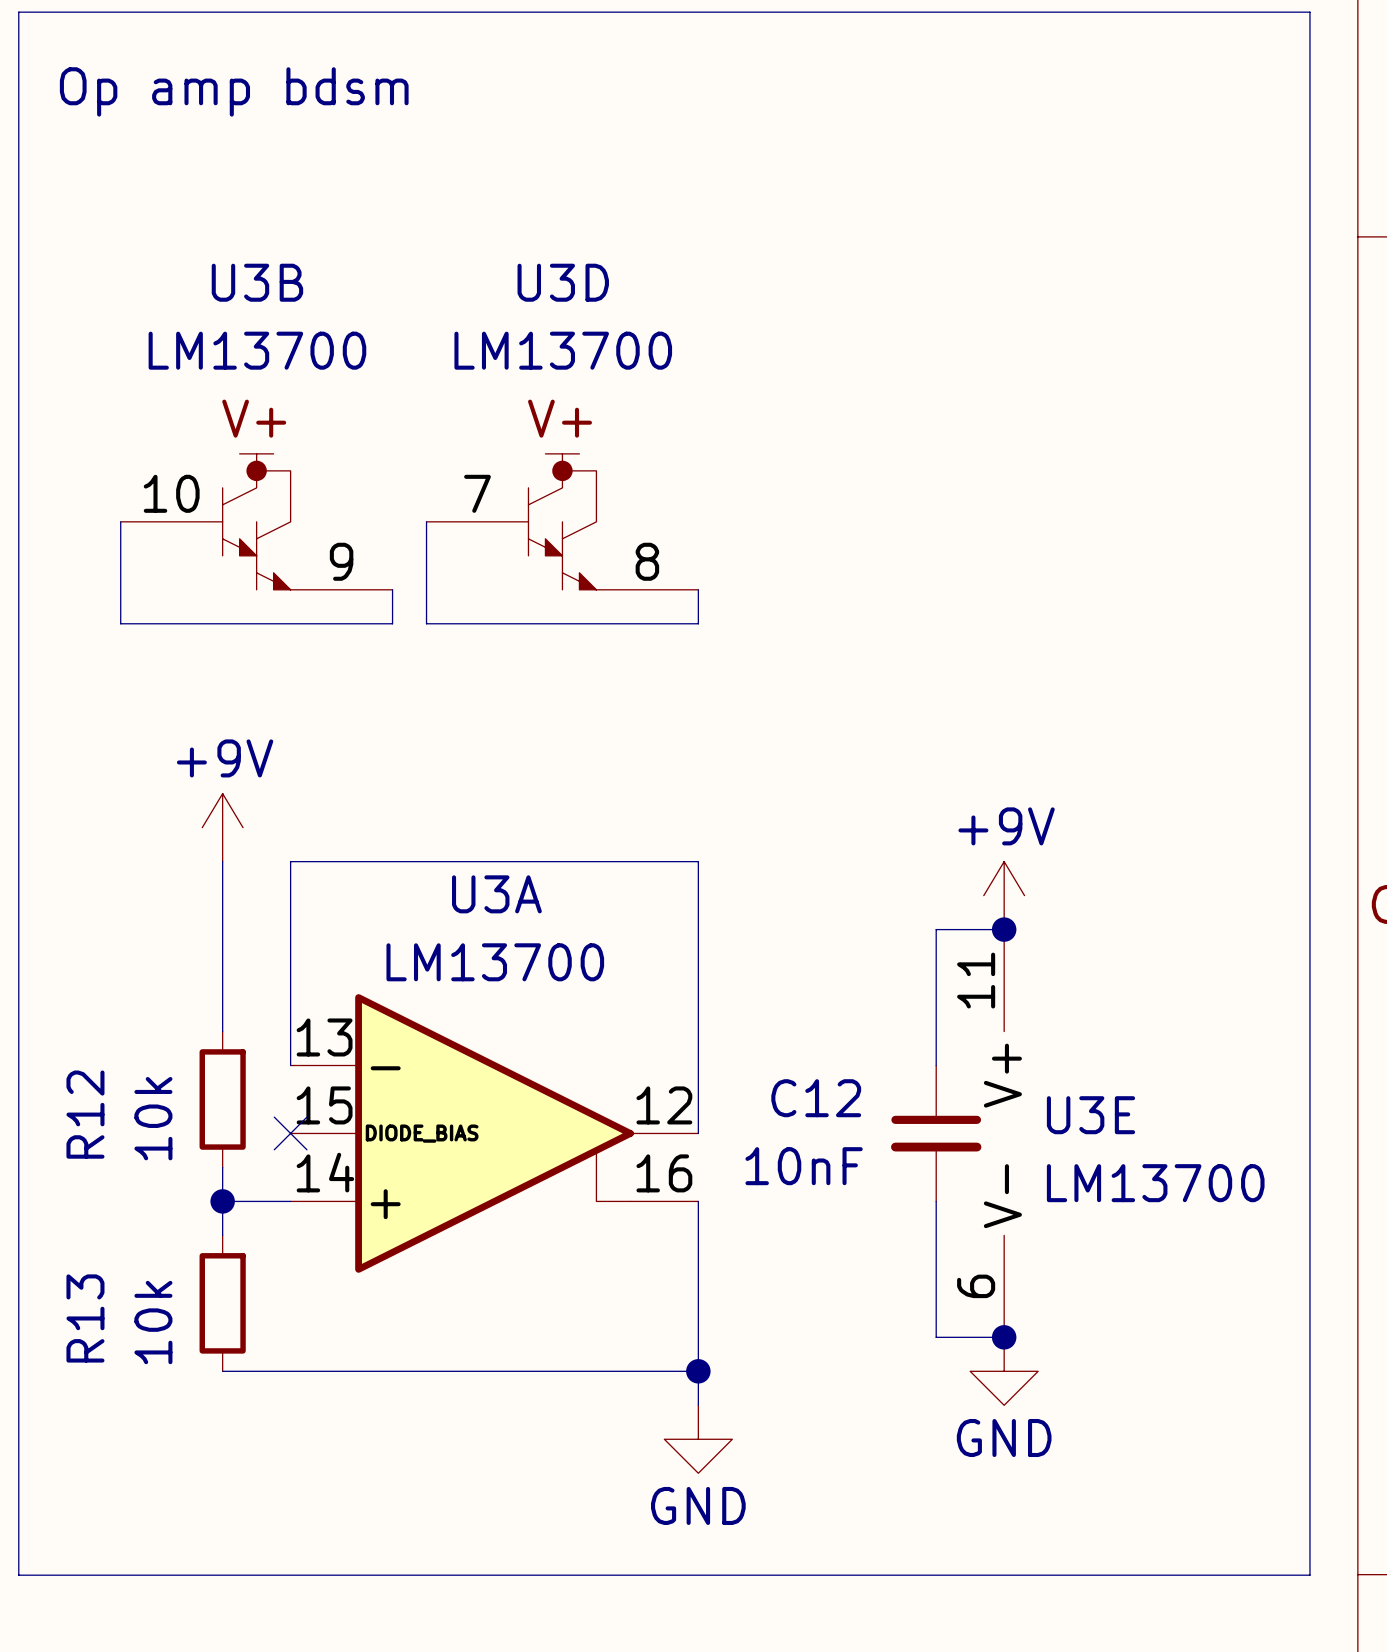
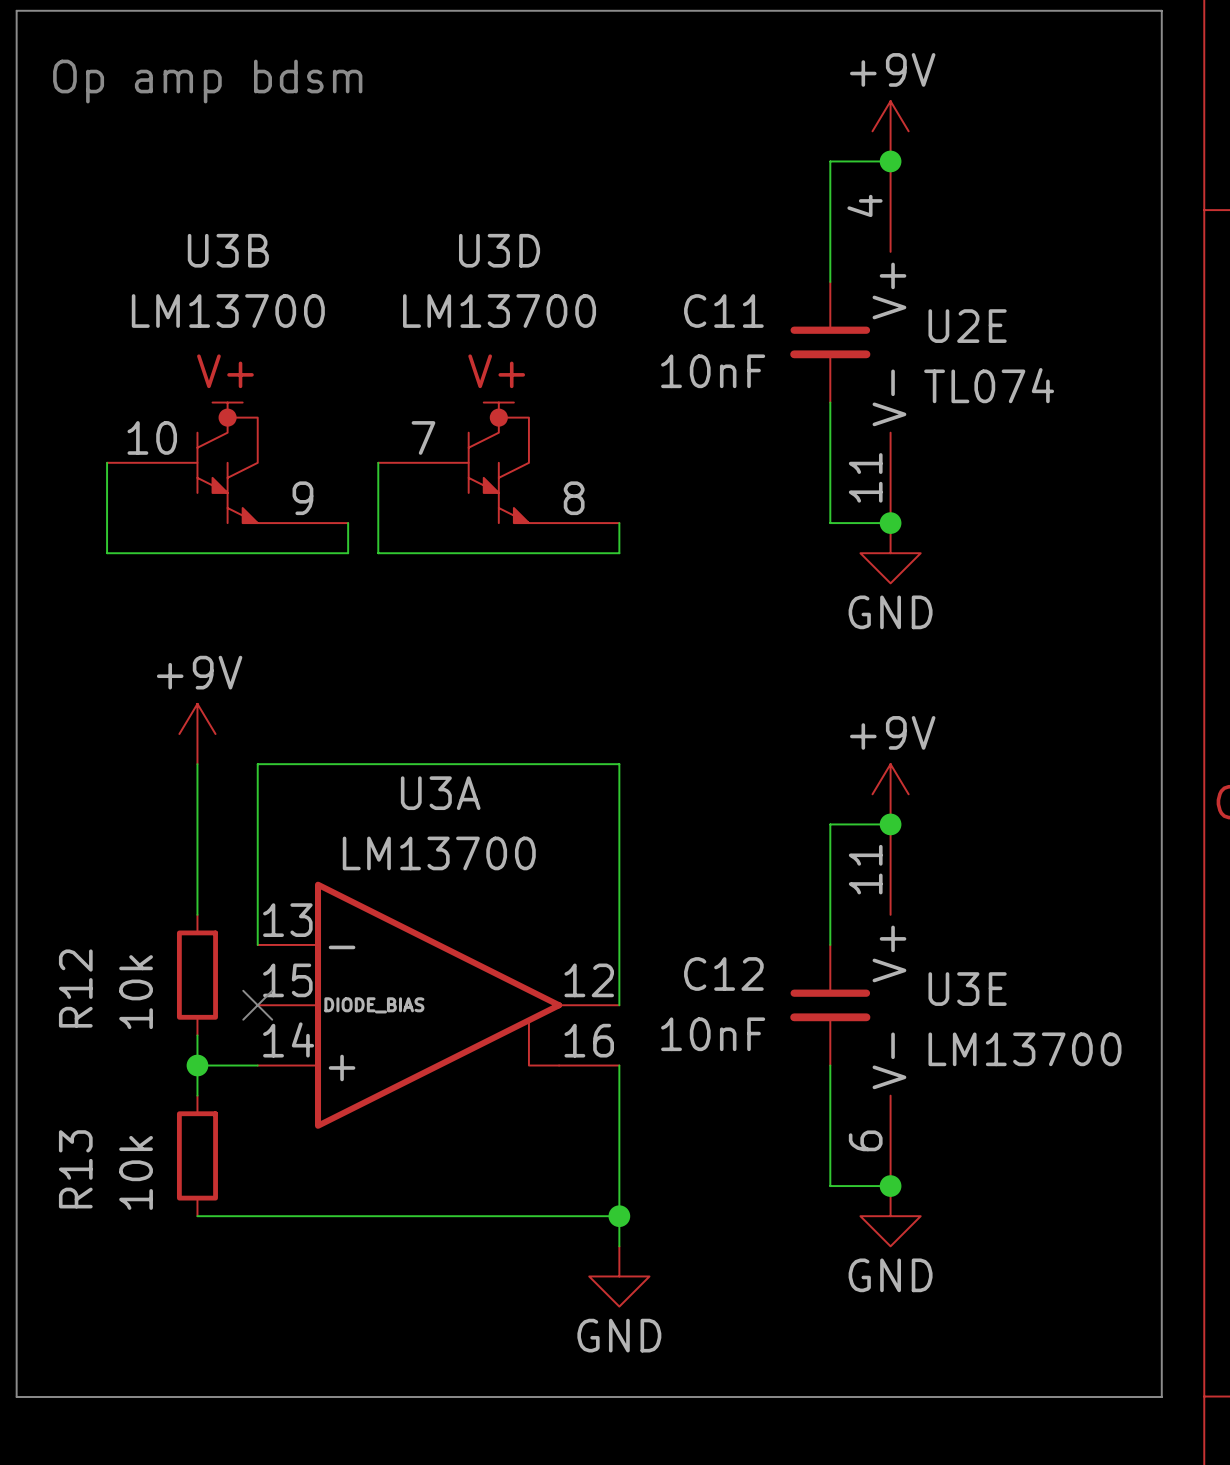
power symbol: none -> +9V (890, 131)
wire: none -> (890, 161) (830, 161) (830, 282)
junction: none -> (890, 161)
C11: none -> 10nF (830, 342)
U2E: none -> TL074 (890, 342)
wire: none -> (830, 402) (830, 523) (890, 523)
junction: none -> (890, 523)
power symbol: none -> GND (890, 553)

